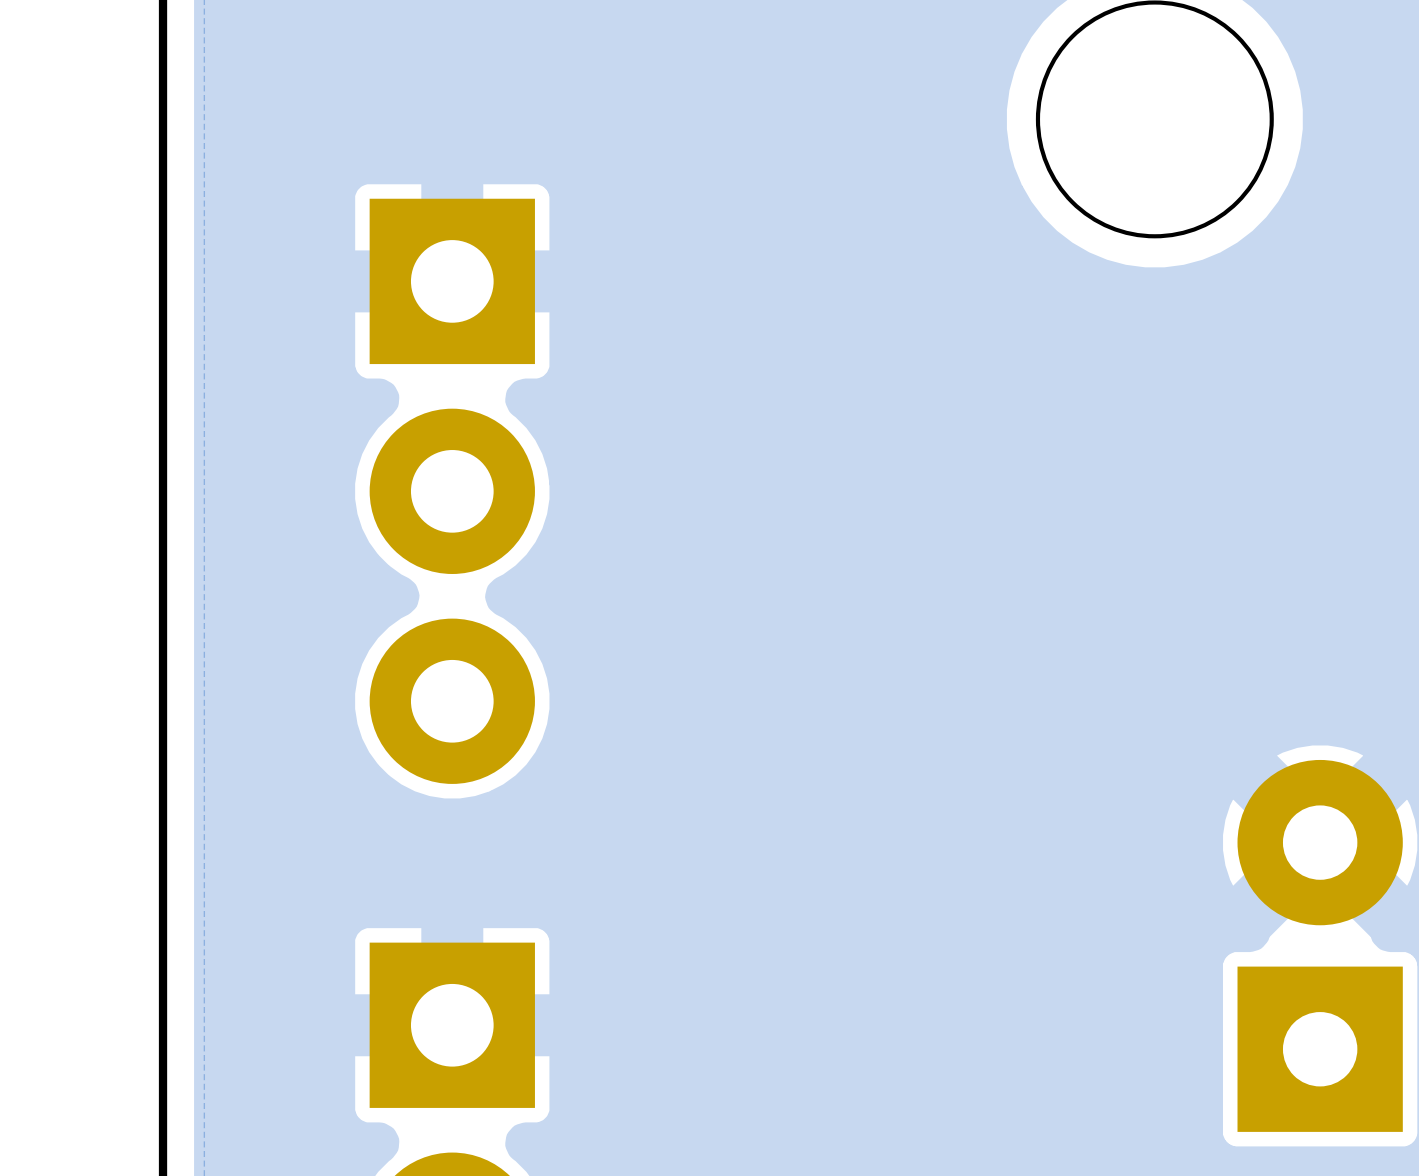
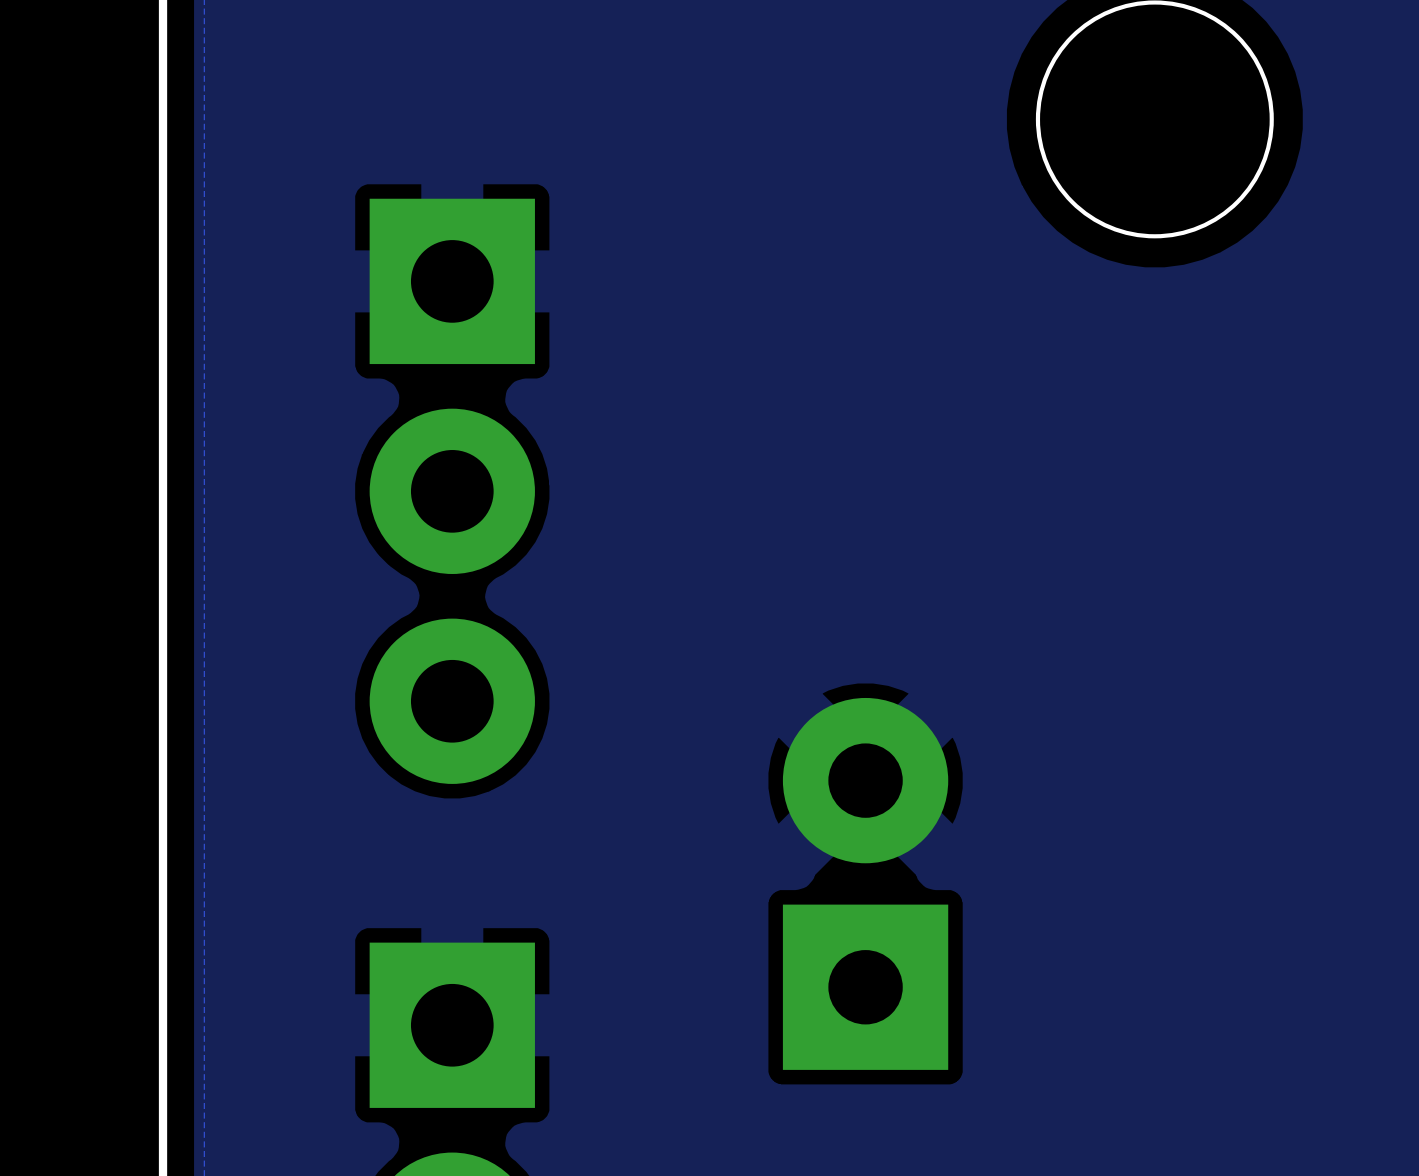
part position: (1320, 945) -> (865, 883)

